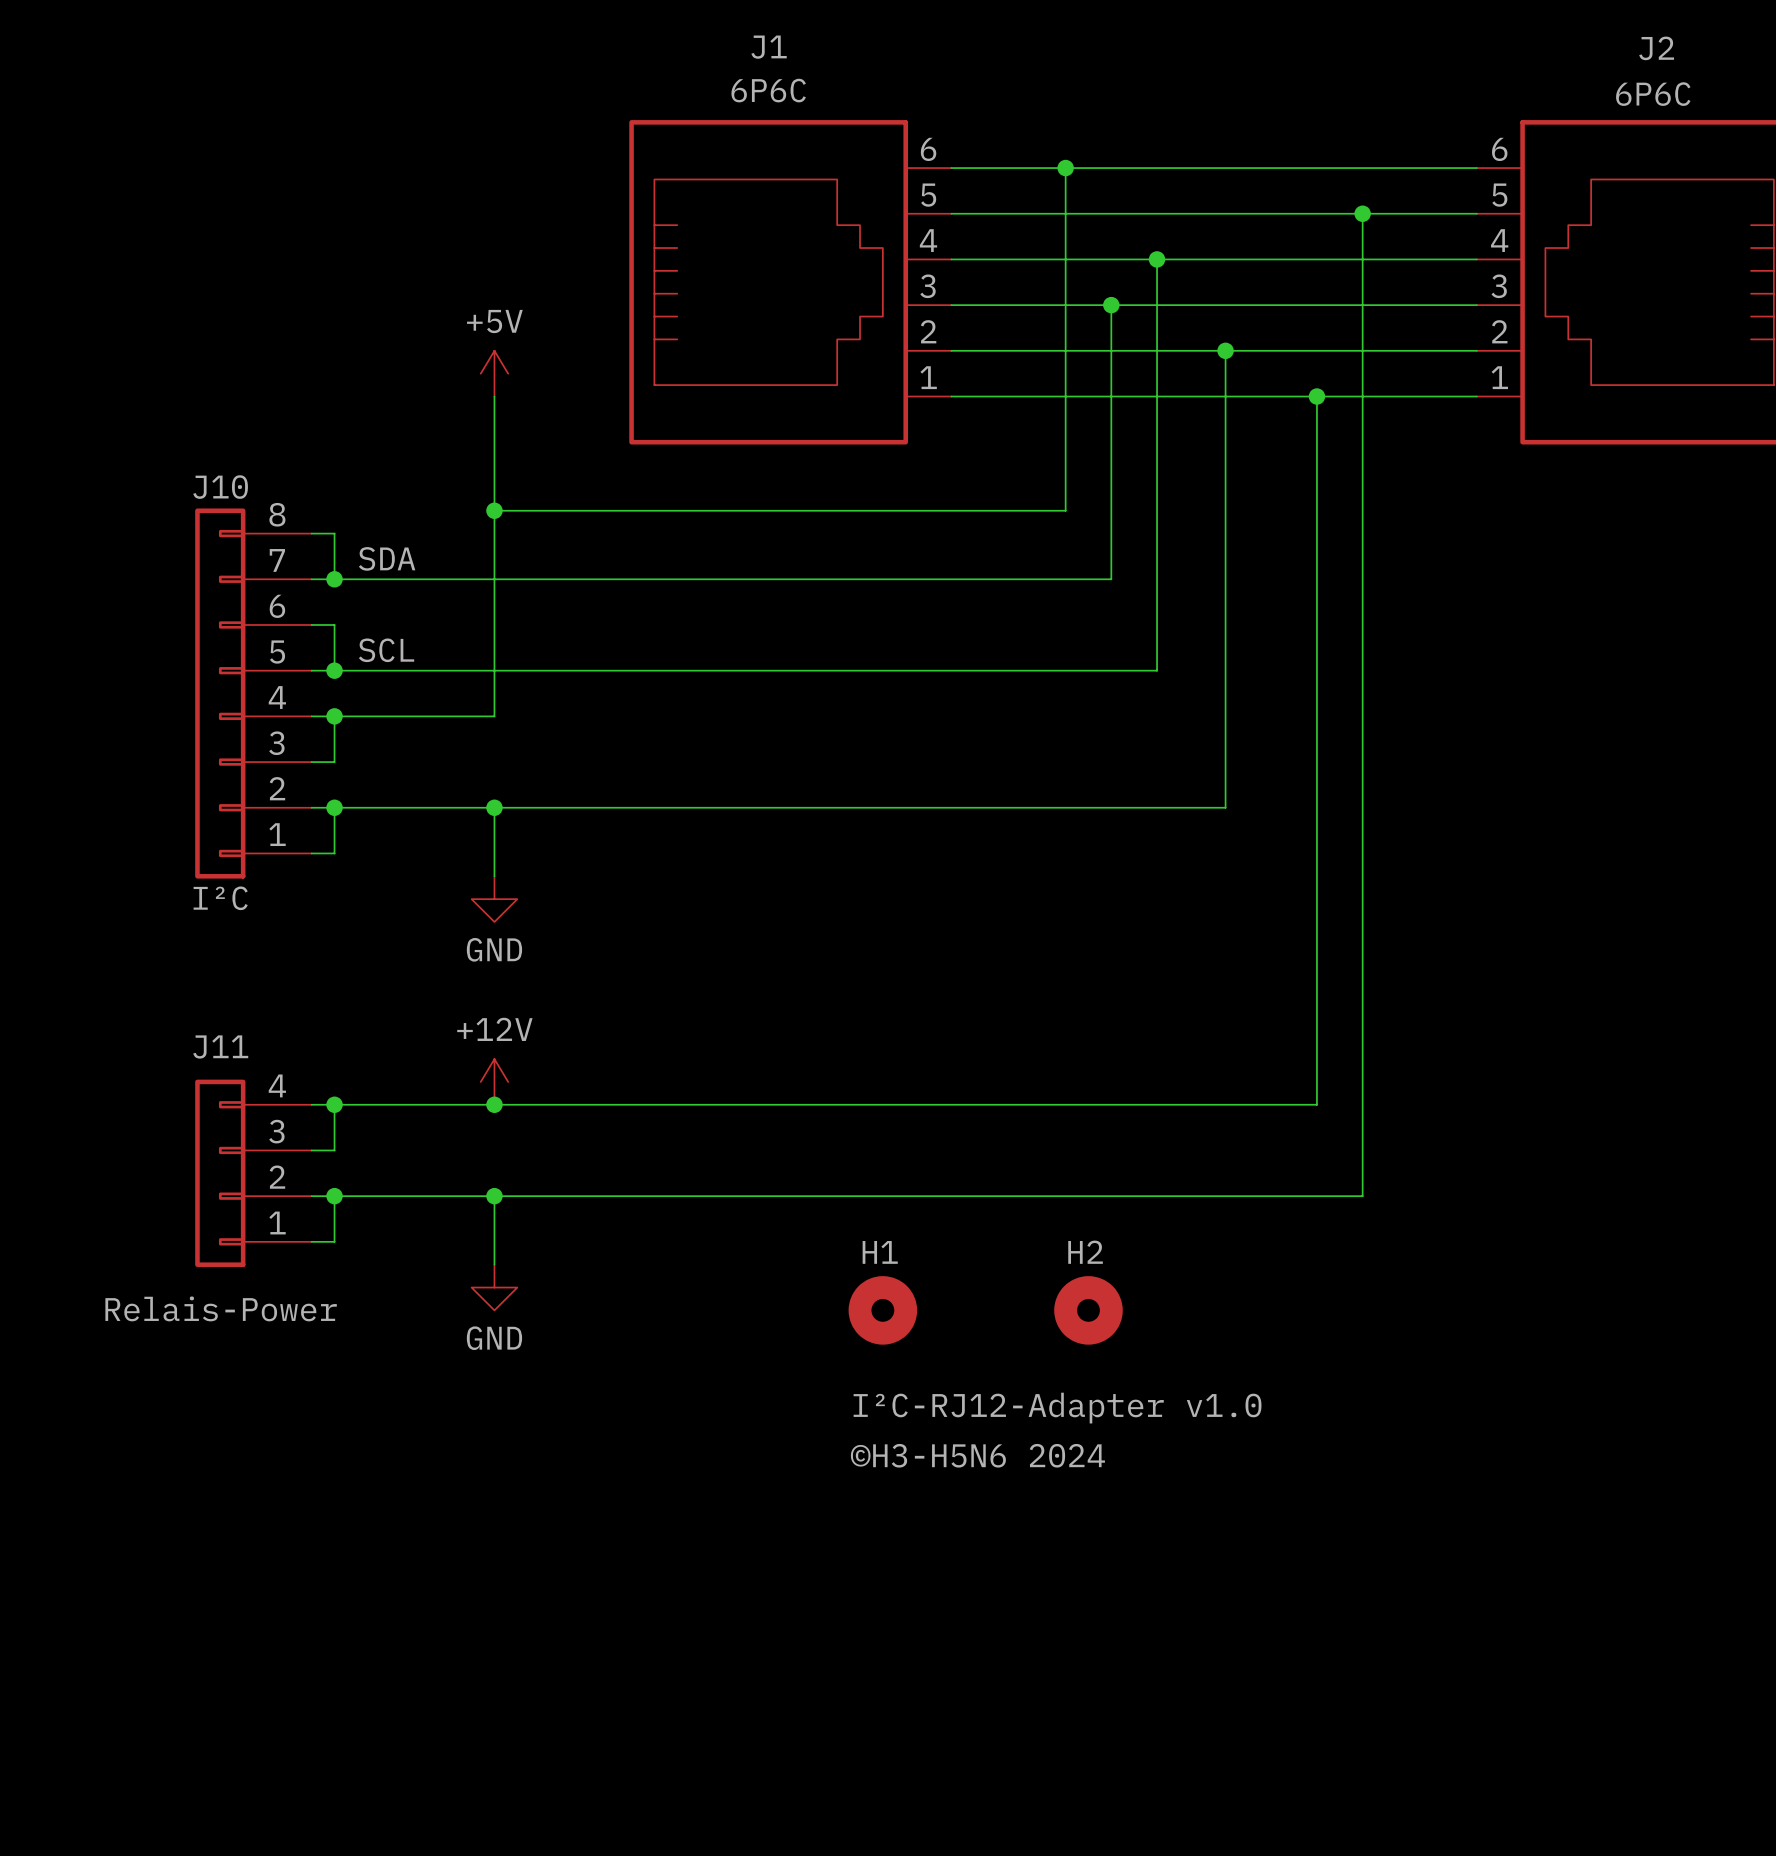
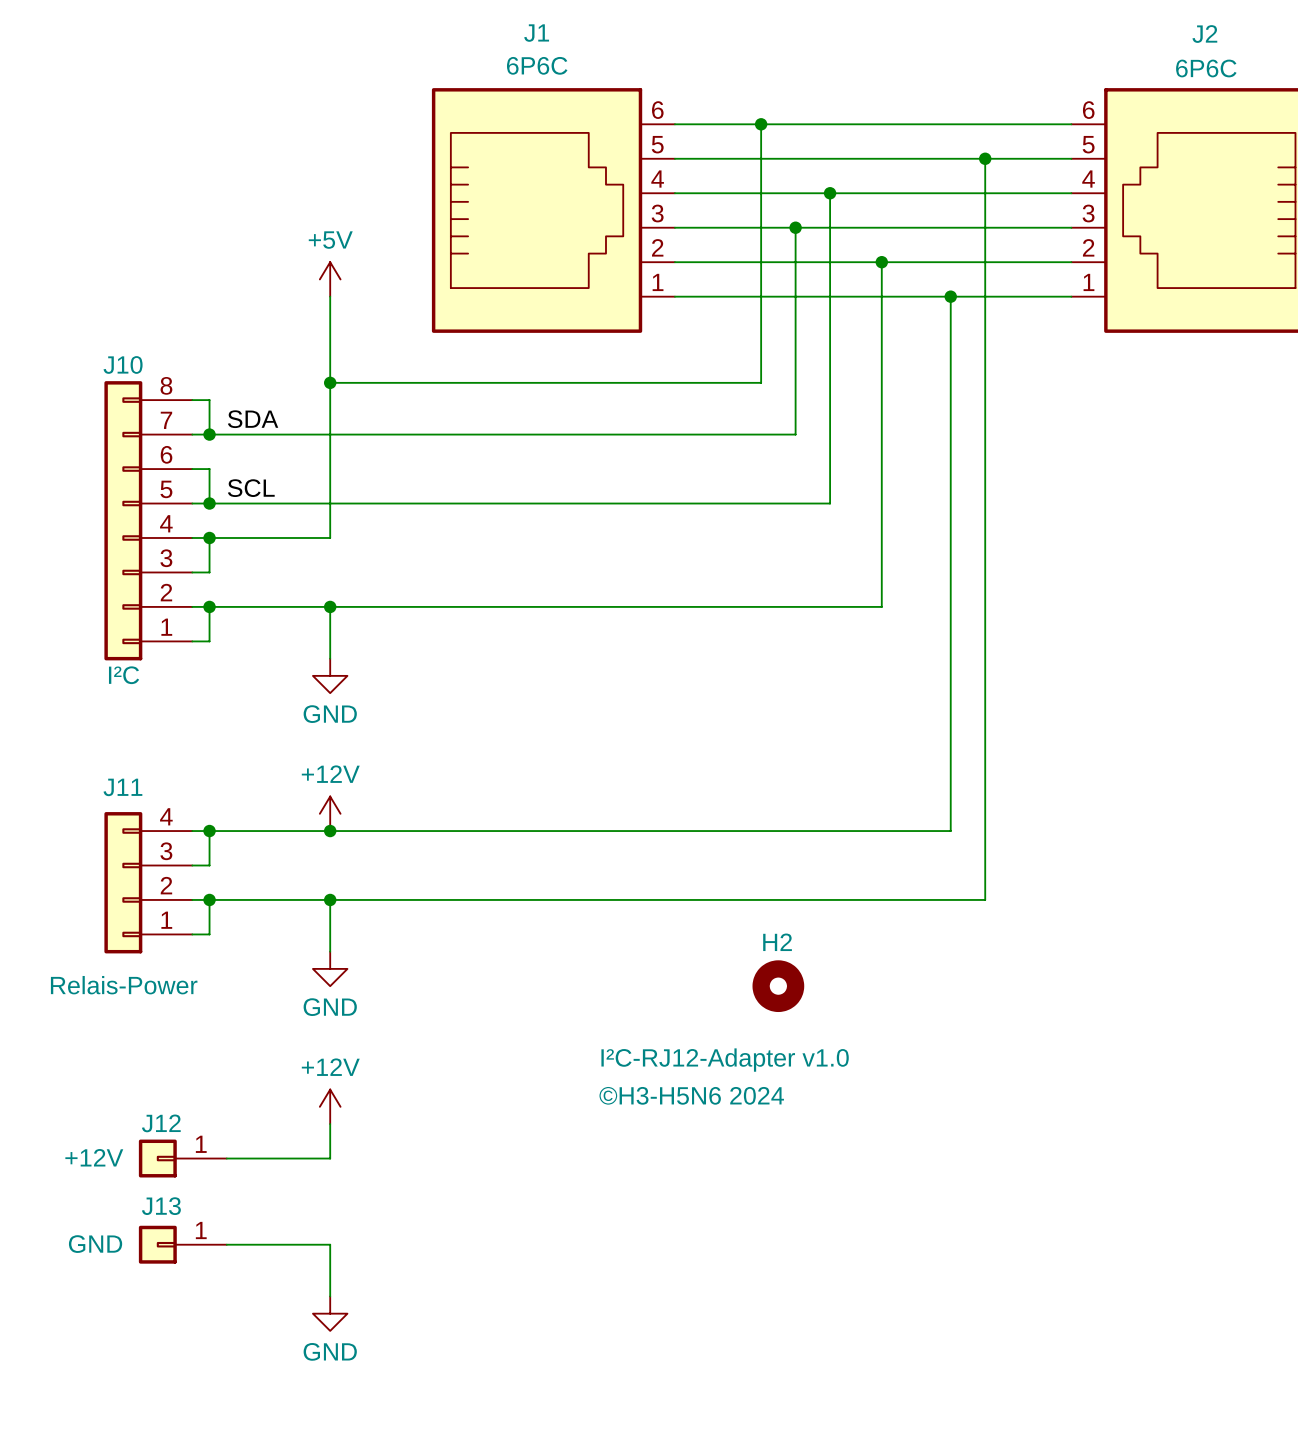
H1: (882, 1310) -> none
power symbol: none -> +12V (330, 1106)
wire: none -> (330, 1124) (330, 1158) (226, 1158)
J12: none -> +12V (182, 1158)
J13: none -> GND (182, 1244)
wire: none -> (226, 1244) (330, 1244) (330, 1296)
power symbol: none -> GND (330, 1313)

